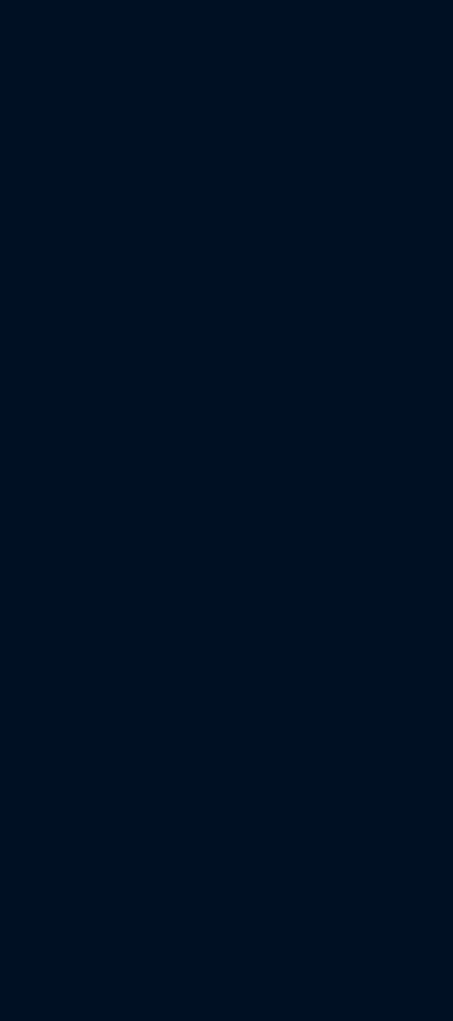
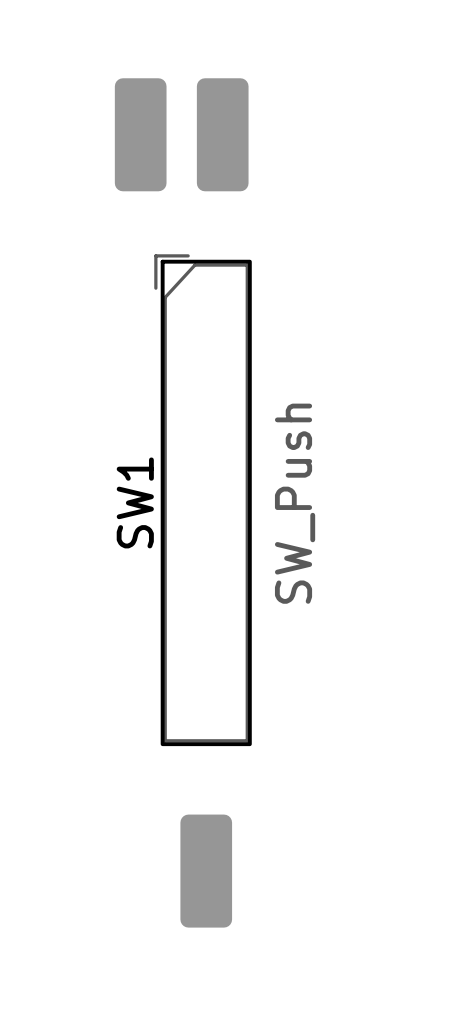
SW1: none -> SW_Push (183, 502)

